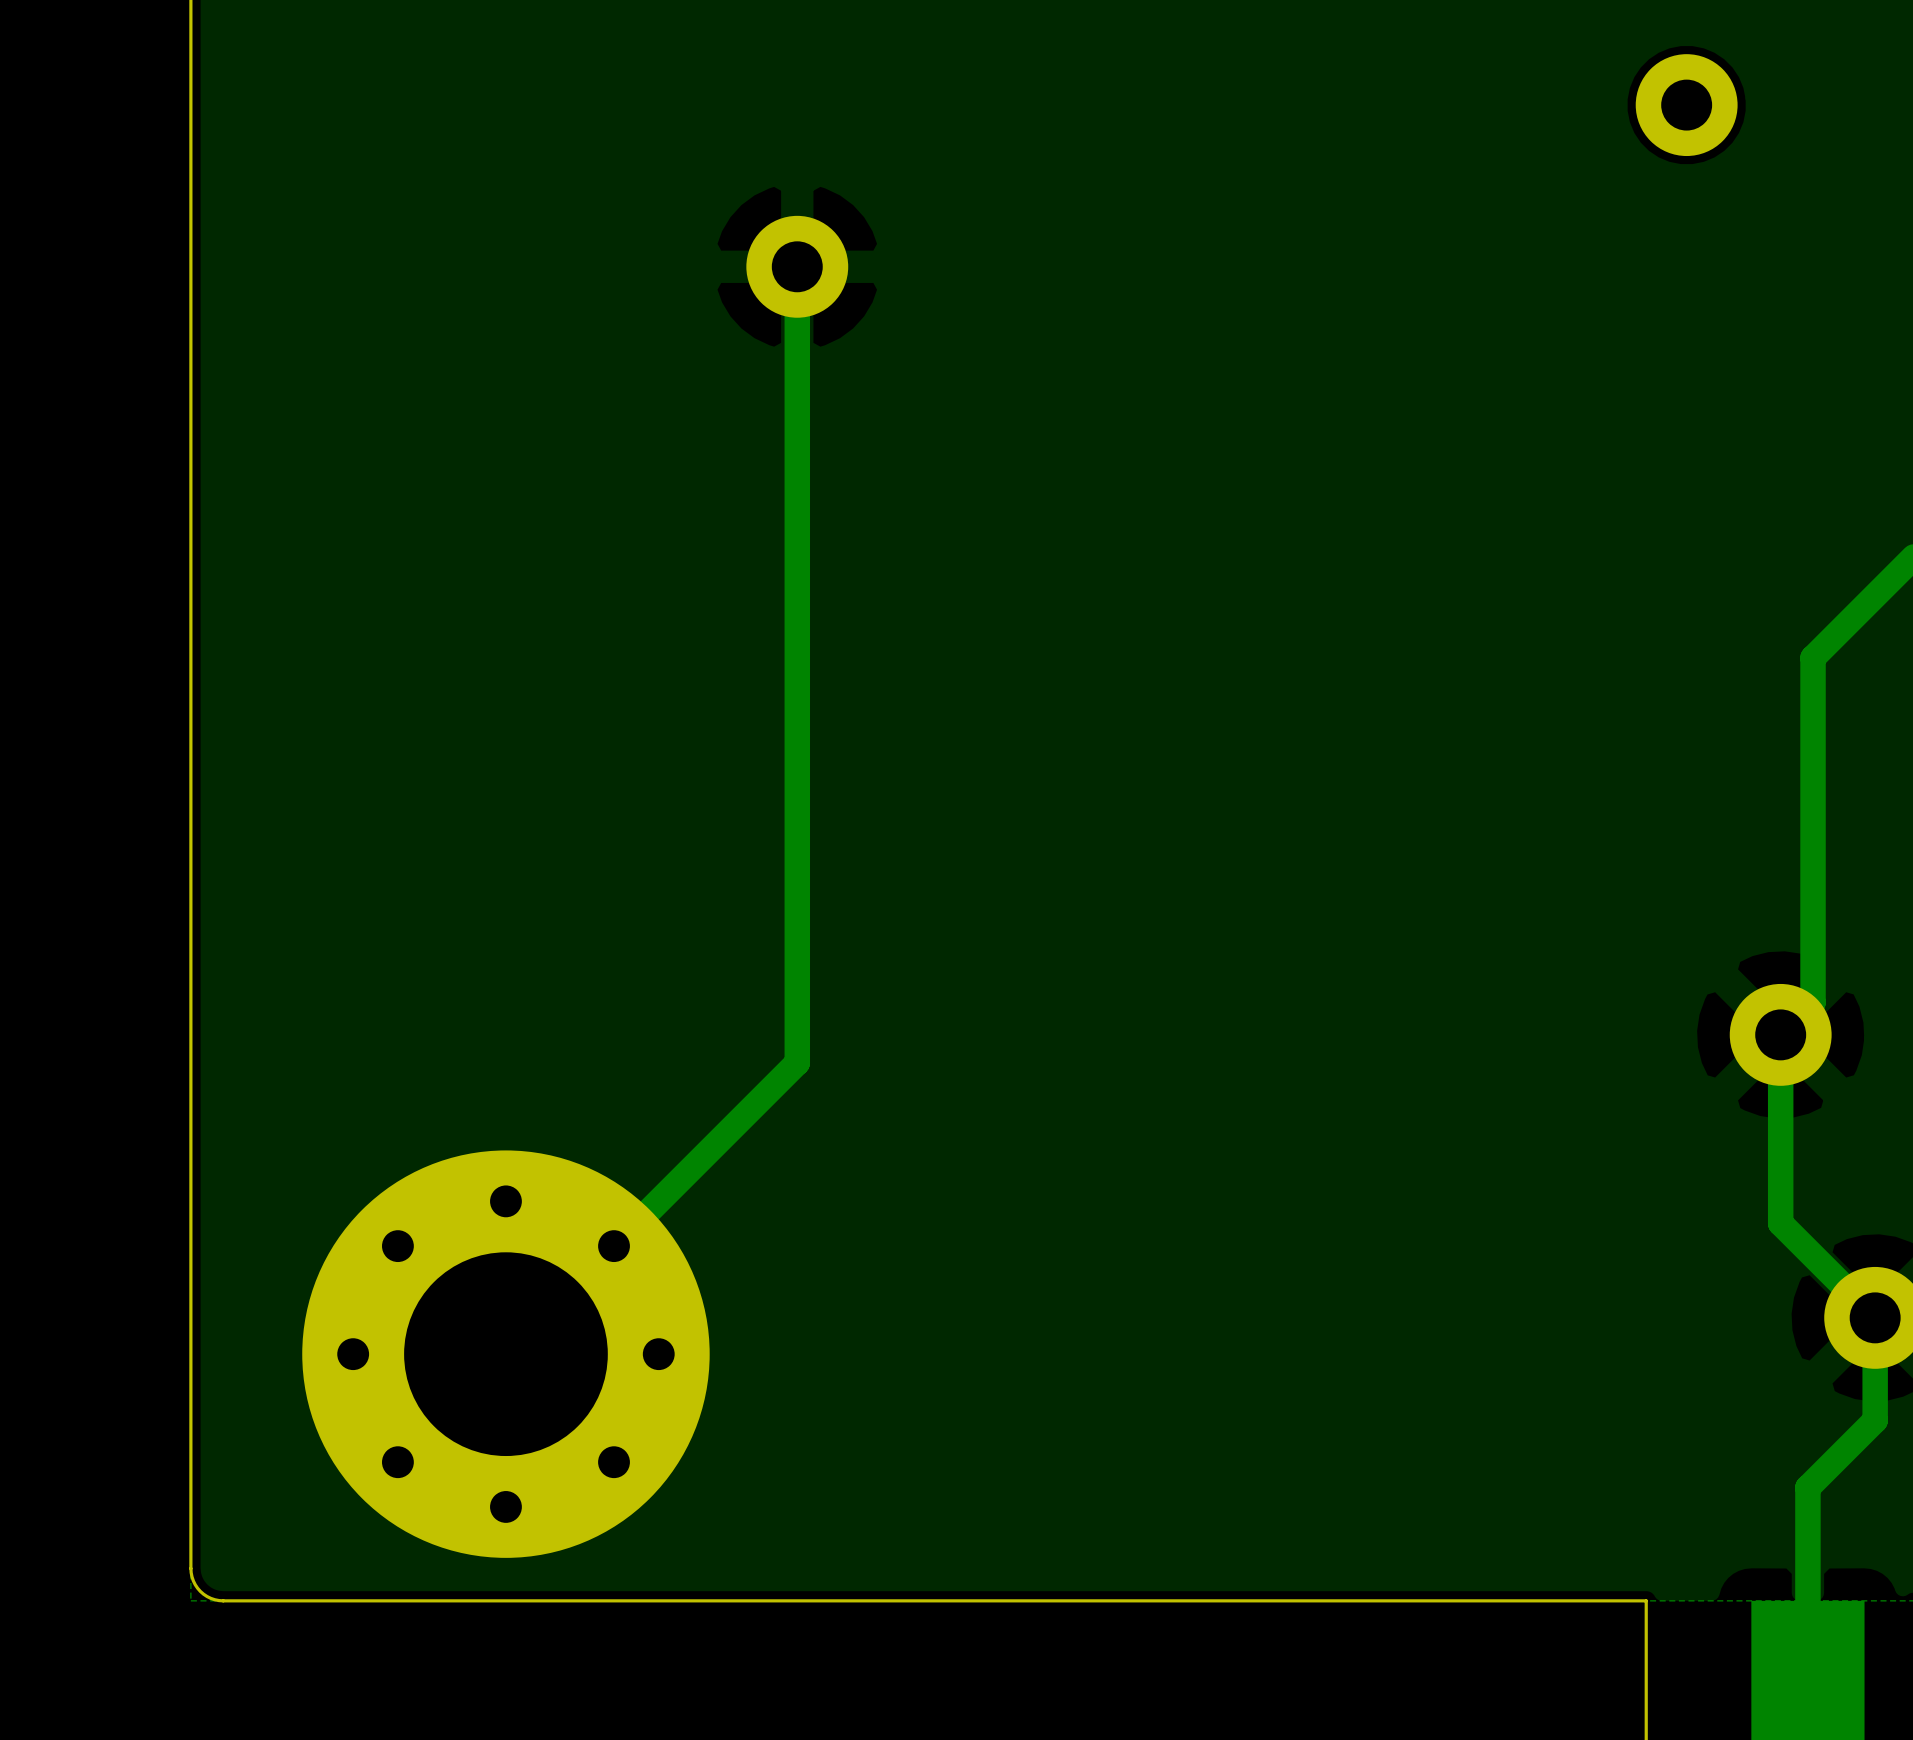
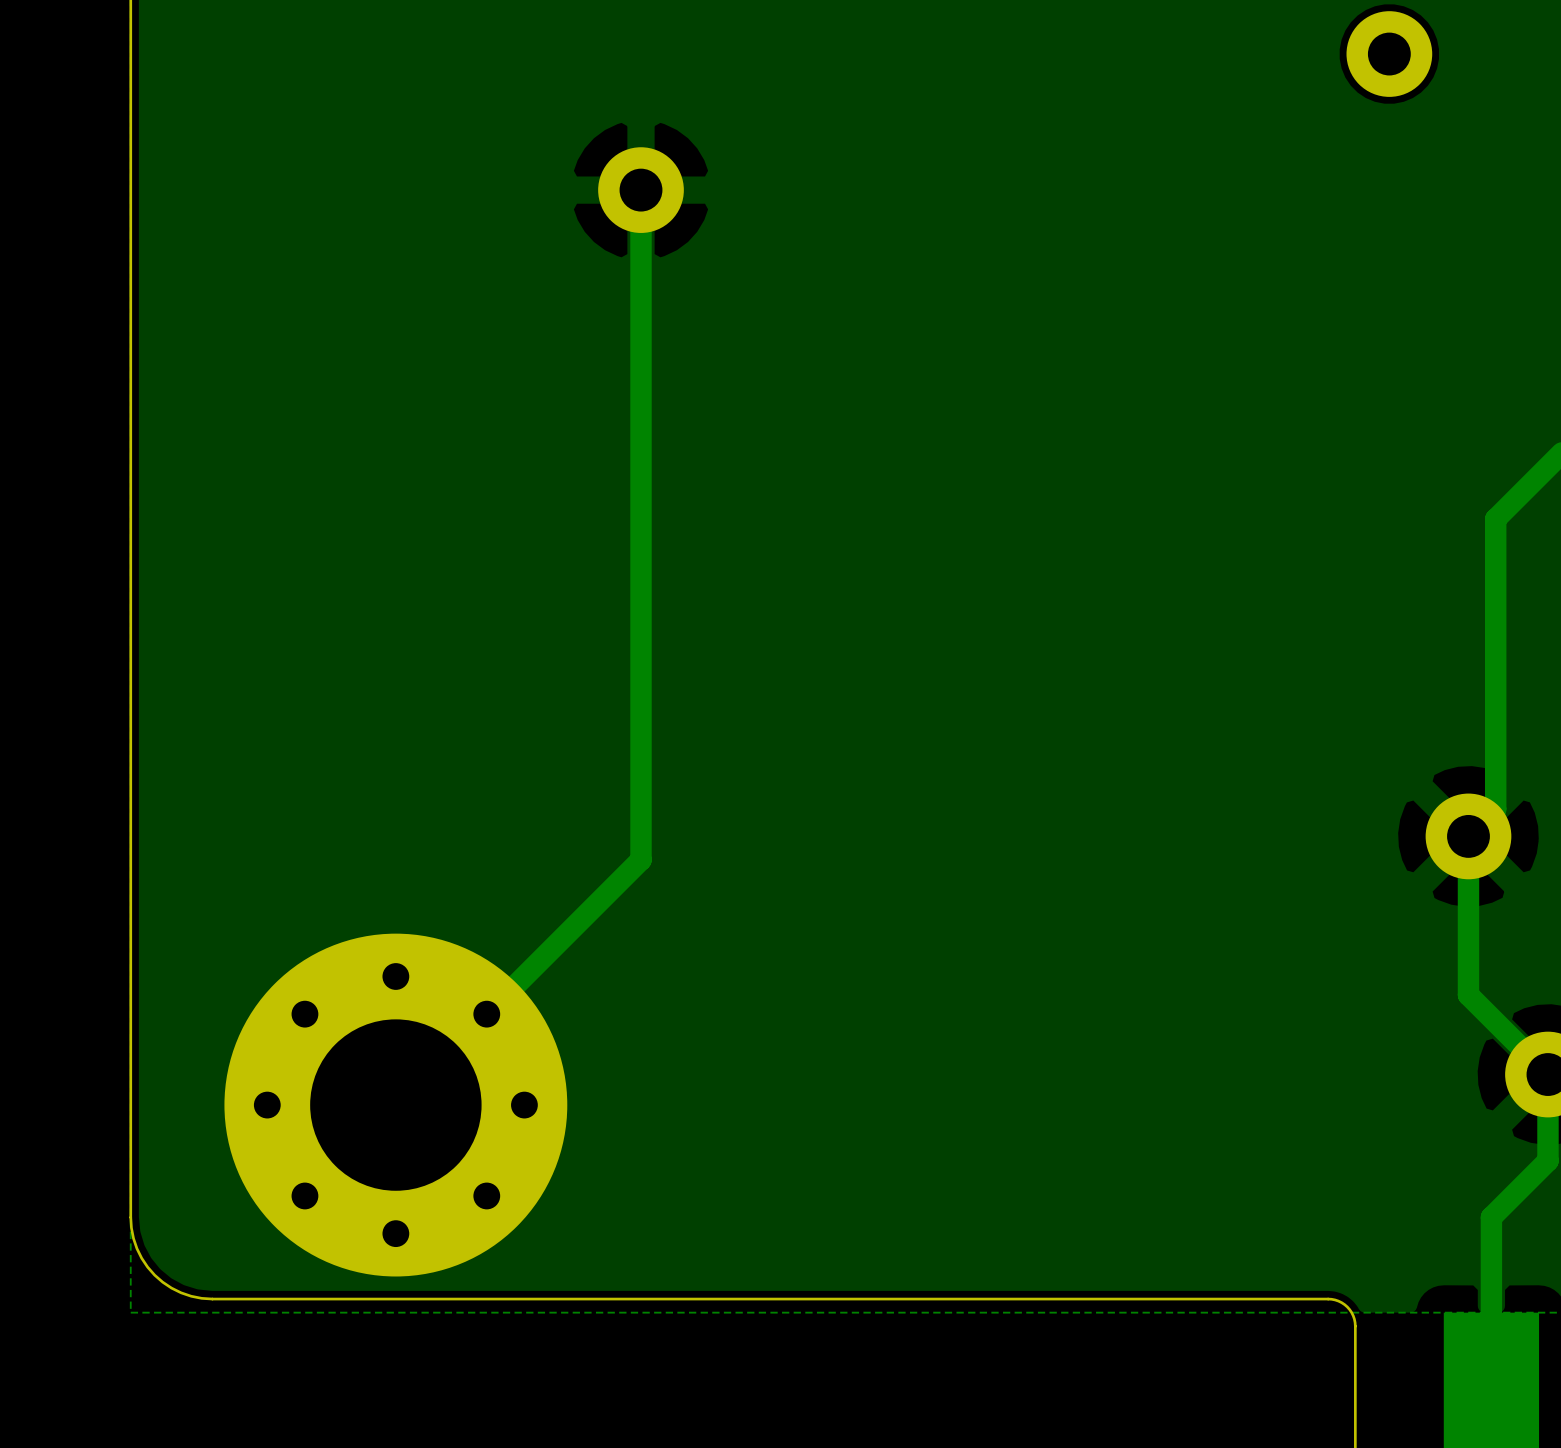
board edge: (190, 1487) (191, 1576) (200, 1591) (207, 1596) (219, 1600) (1646, 1600) (1646, 1617) -> (130, 1217) (136, 1248) (147, 1267) (171, 1288) (201, 1298) (1328, 1299) (1338, 1301) (1347, 1307) (1353, 1315) (1355, 1326)

